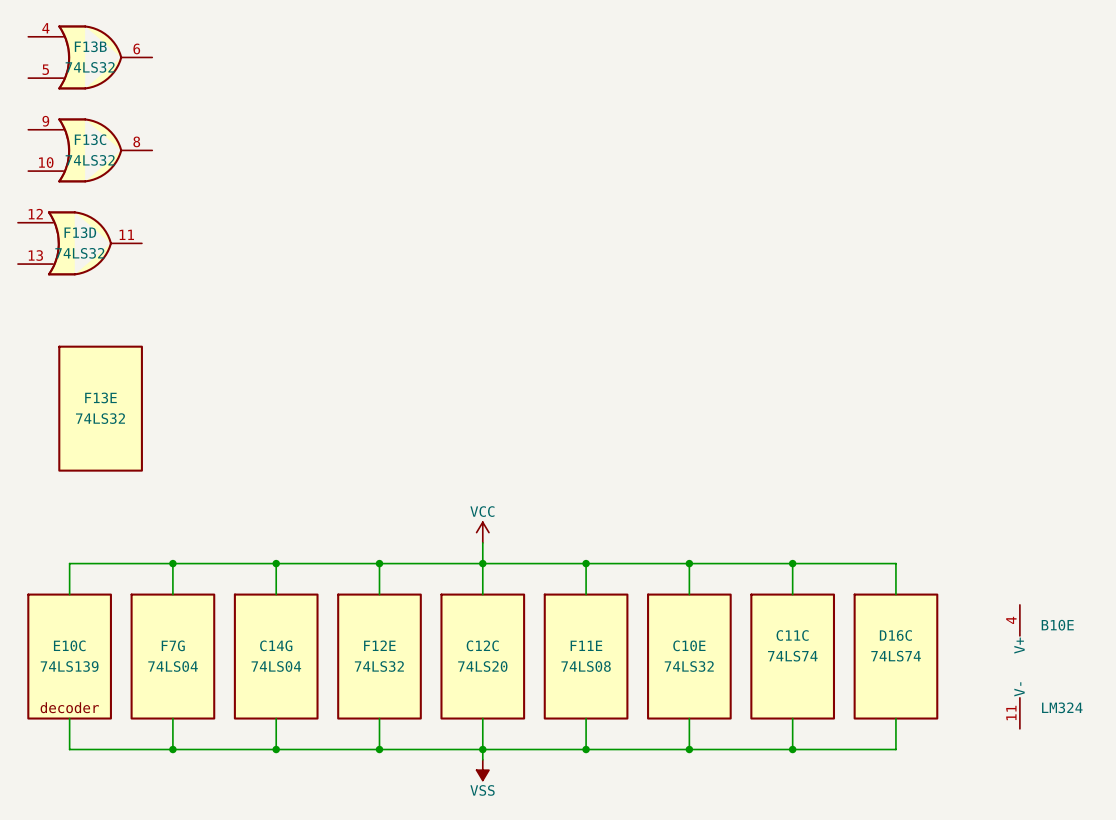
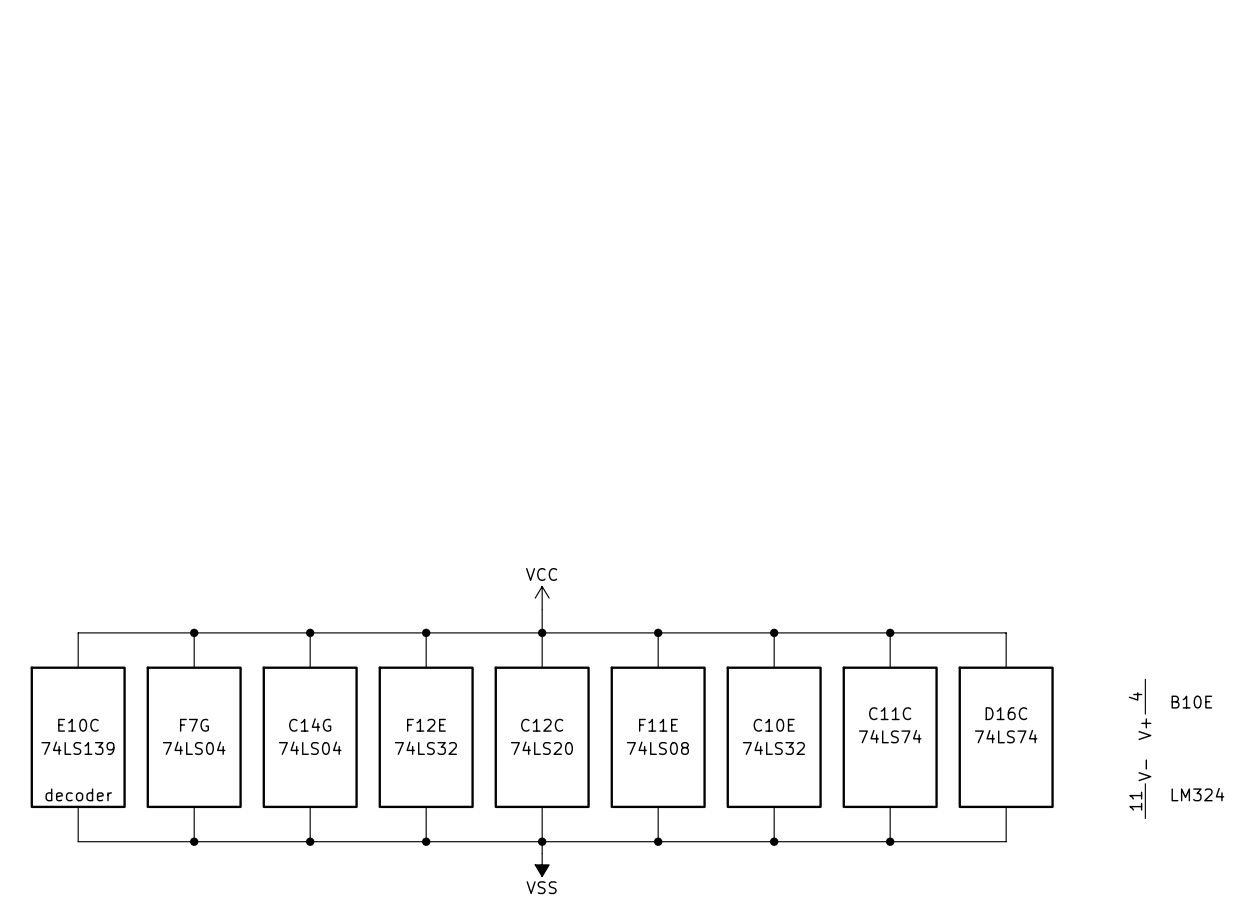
F13B: 74LS32 (90, 57) -> none
F13C: 74LS32 (90, 150) -> none
F13D: 74LS32 (79, 243) -> none
F13E: 74LS32 (100, 408) -> none

